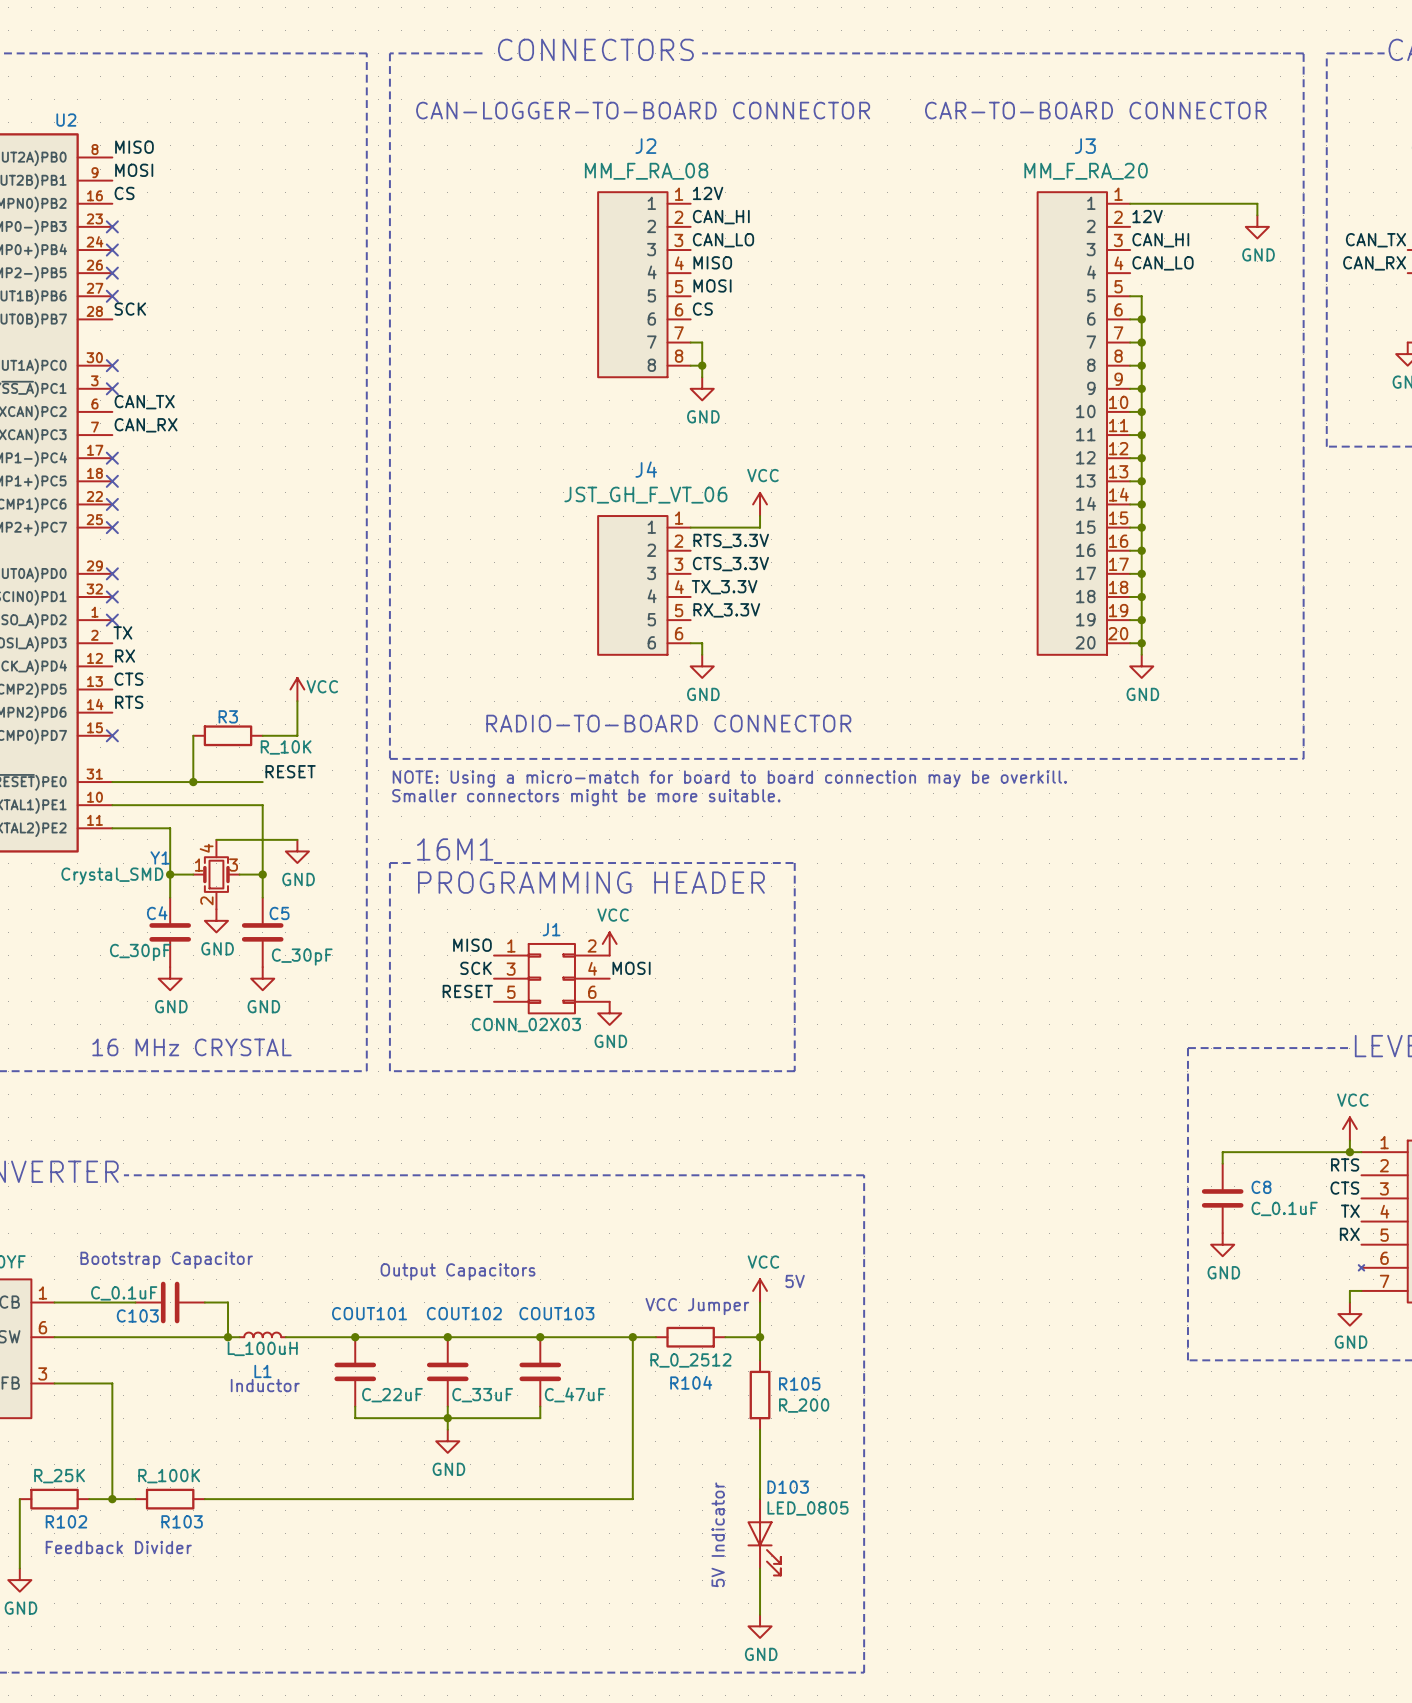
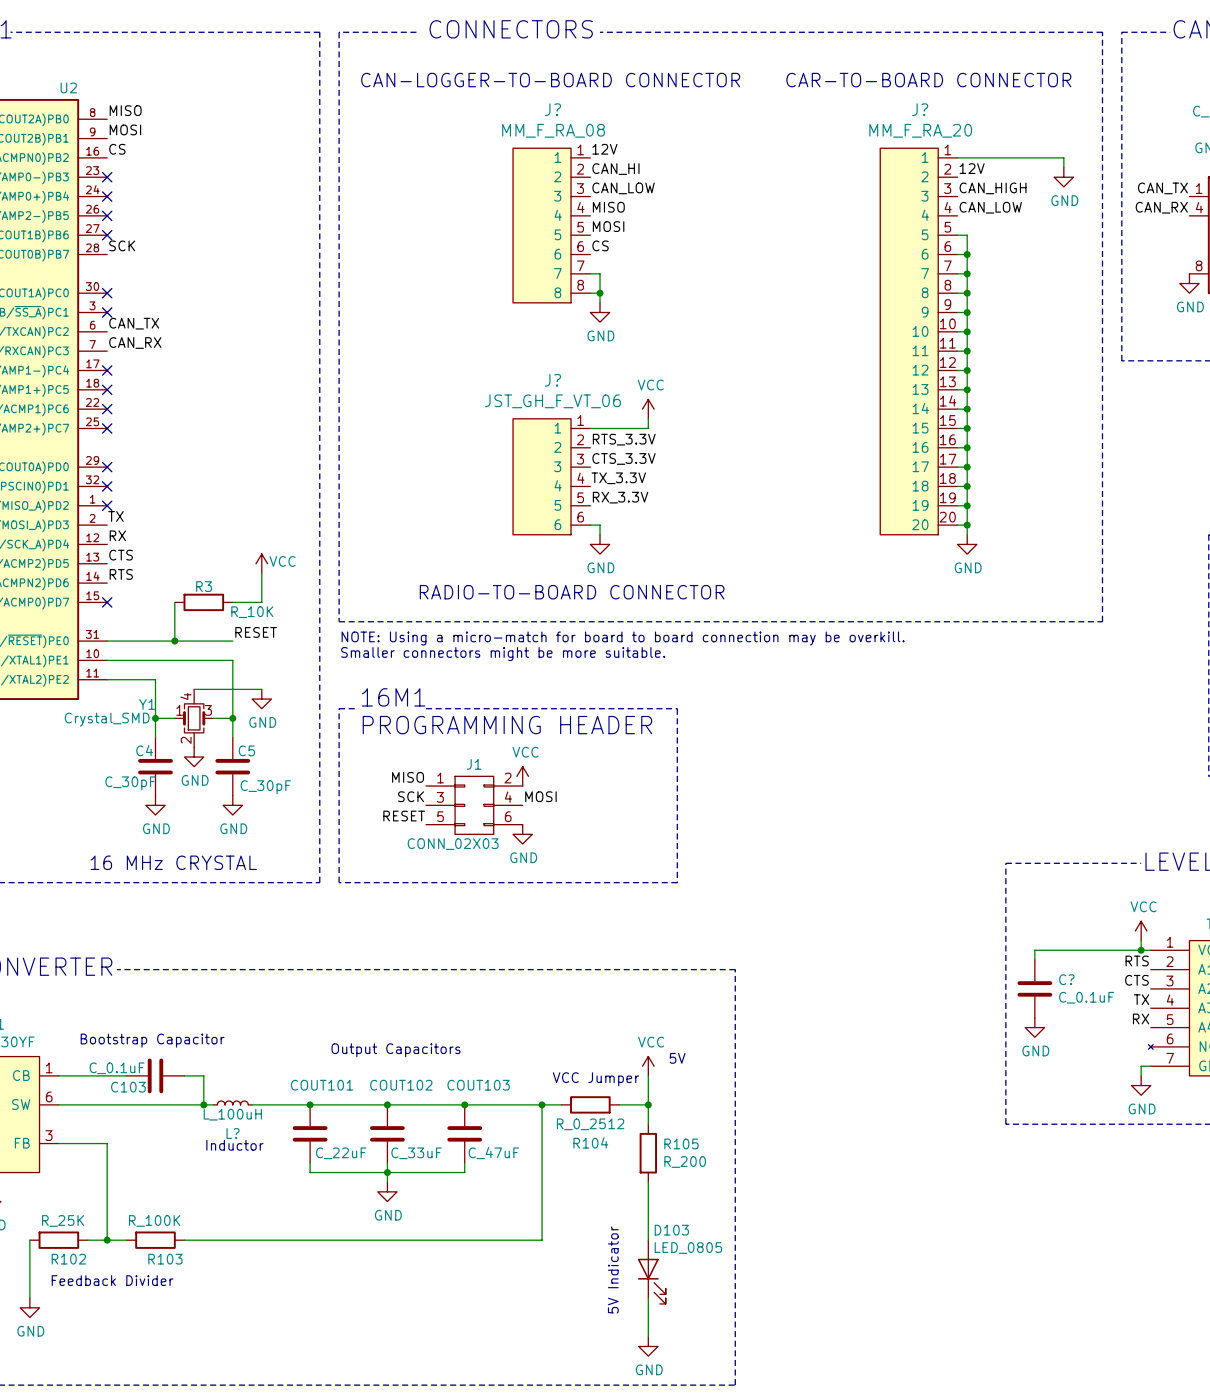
J2 name: J2 (645, 146) -> J? (552, 109)
J3 name: J3 (1085, 146) -> J? (920, 109)
label: CAN_LO (723, 240) -> CAN_LOW (623, 188)
label: CAN_HI (1160, 240) -> CAN_HIGH (993, 188)
label: CAN_LO (1163, 263) -> CAN_LOW (990, 207)
J4 name: J4 (646, 469) -> J? (552, 380)
C8 name: C8 (1261, 1187) -> C? (1066, 979)
L1 name: L1 (262, 1371) -> L? (233, 1133)

